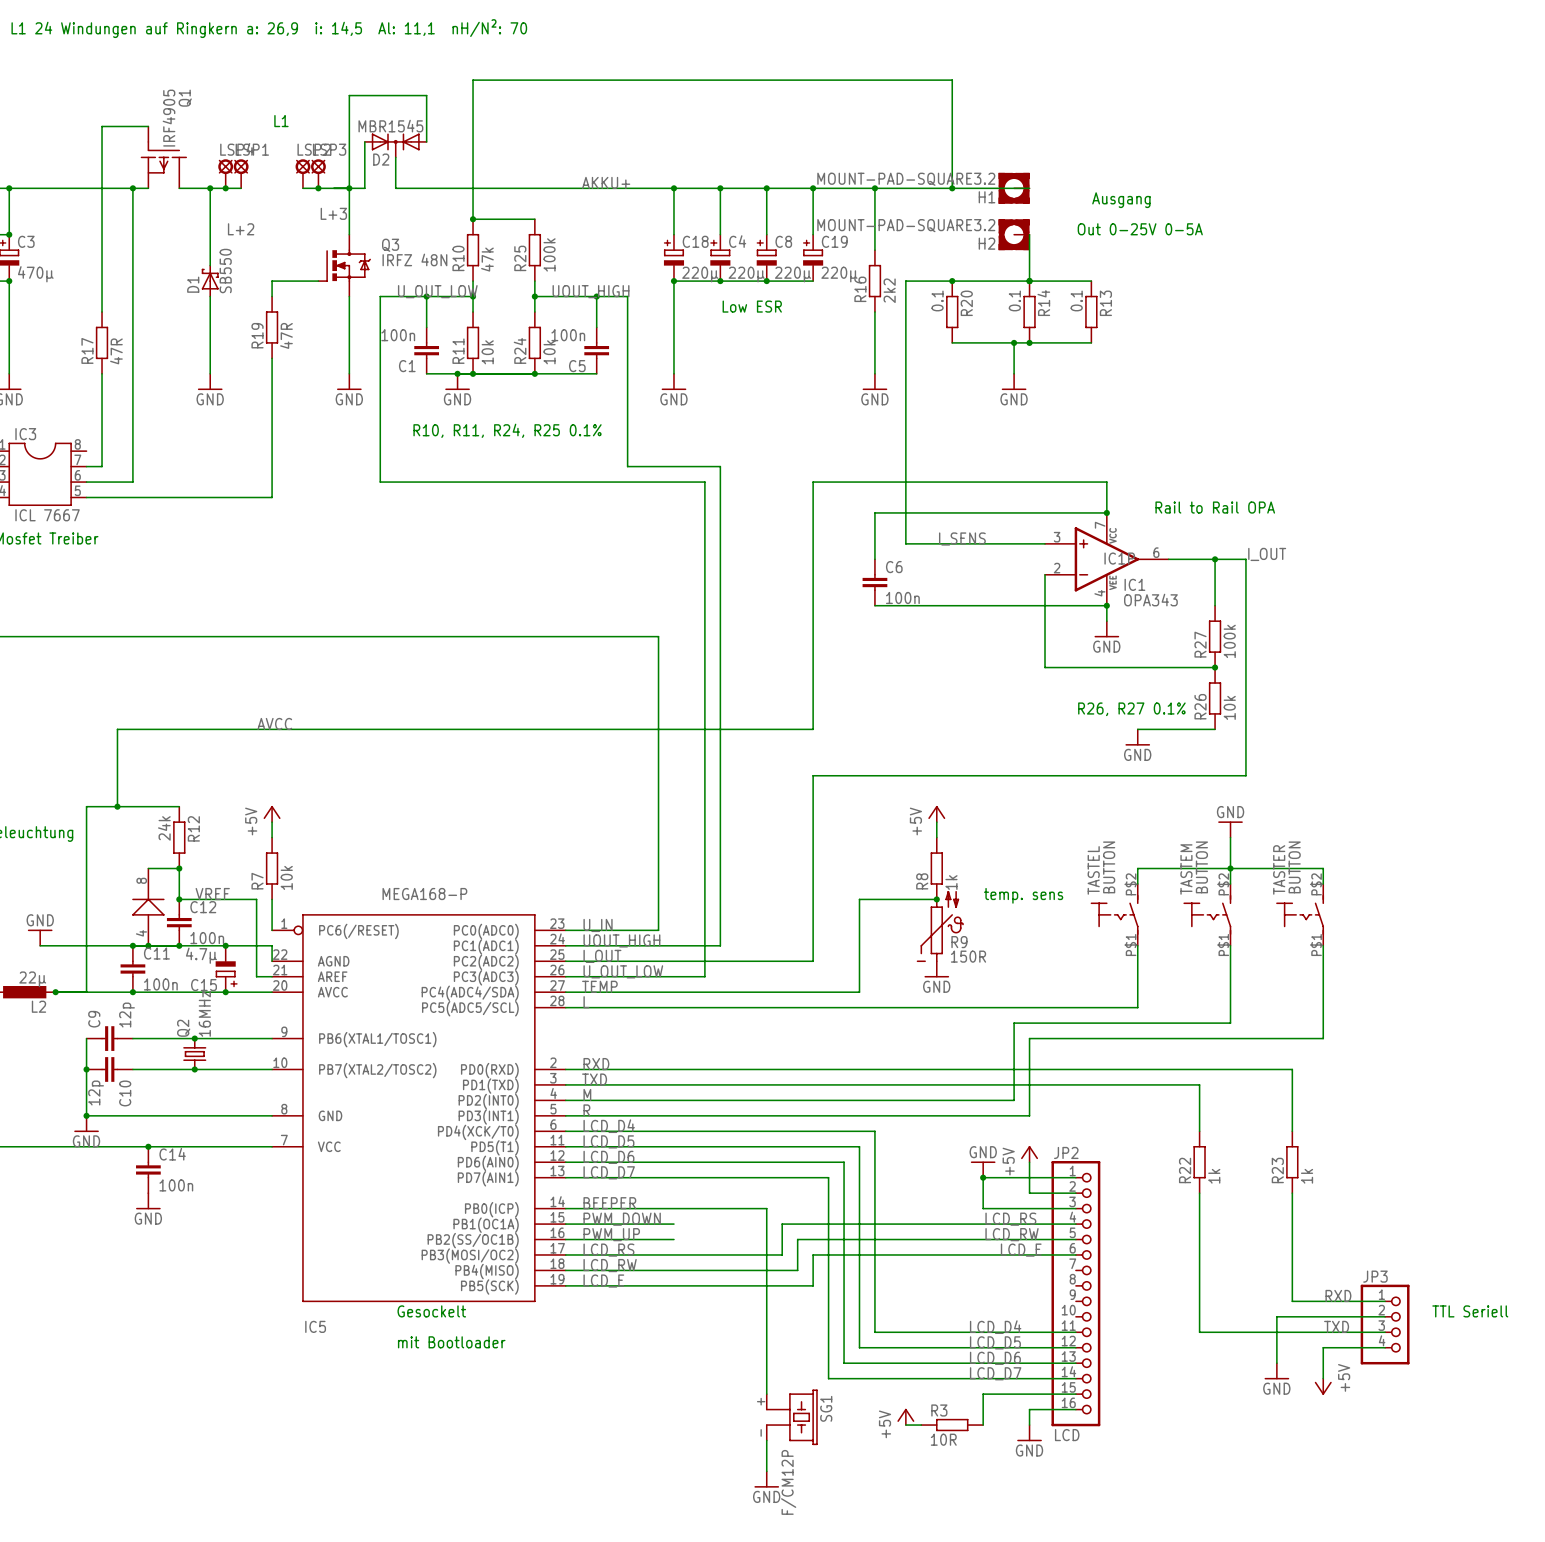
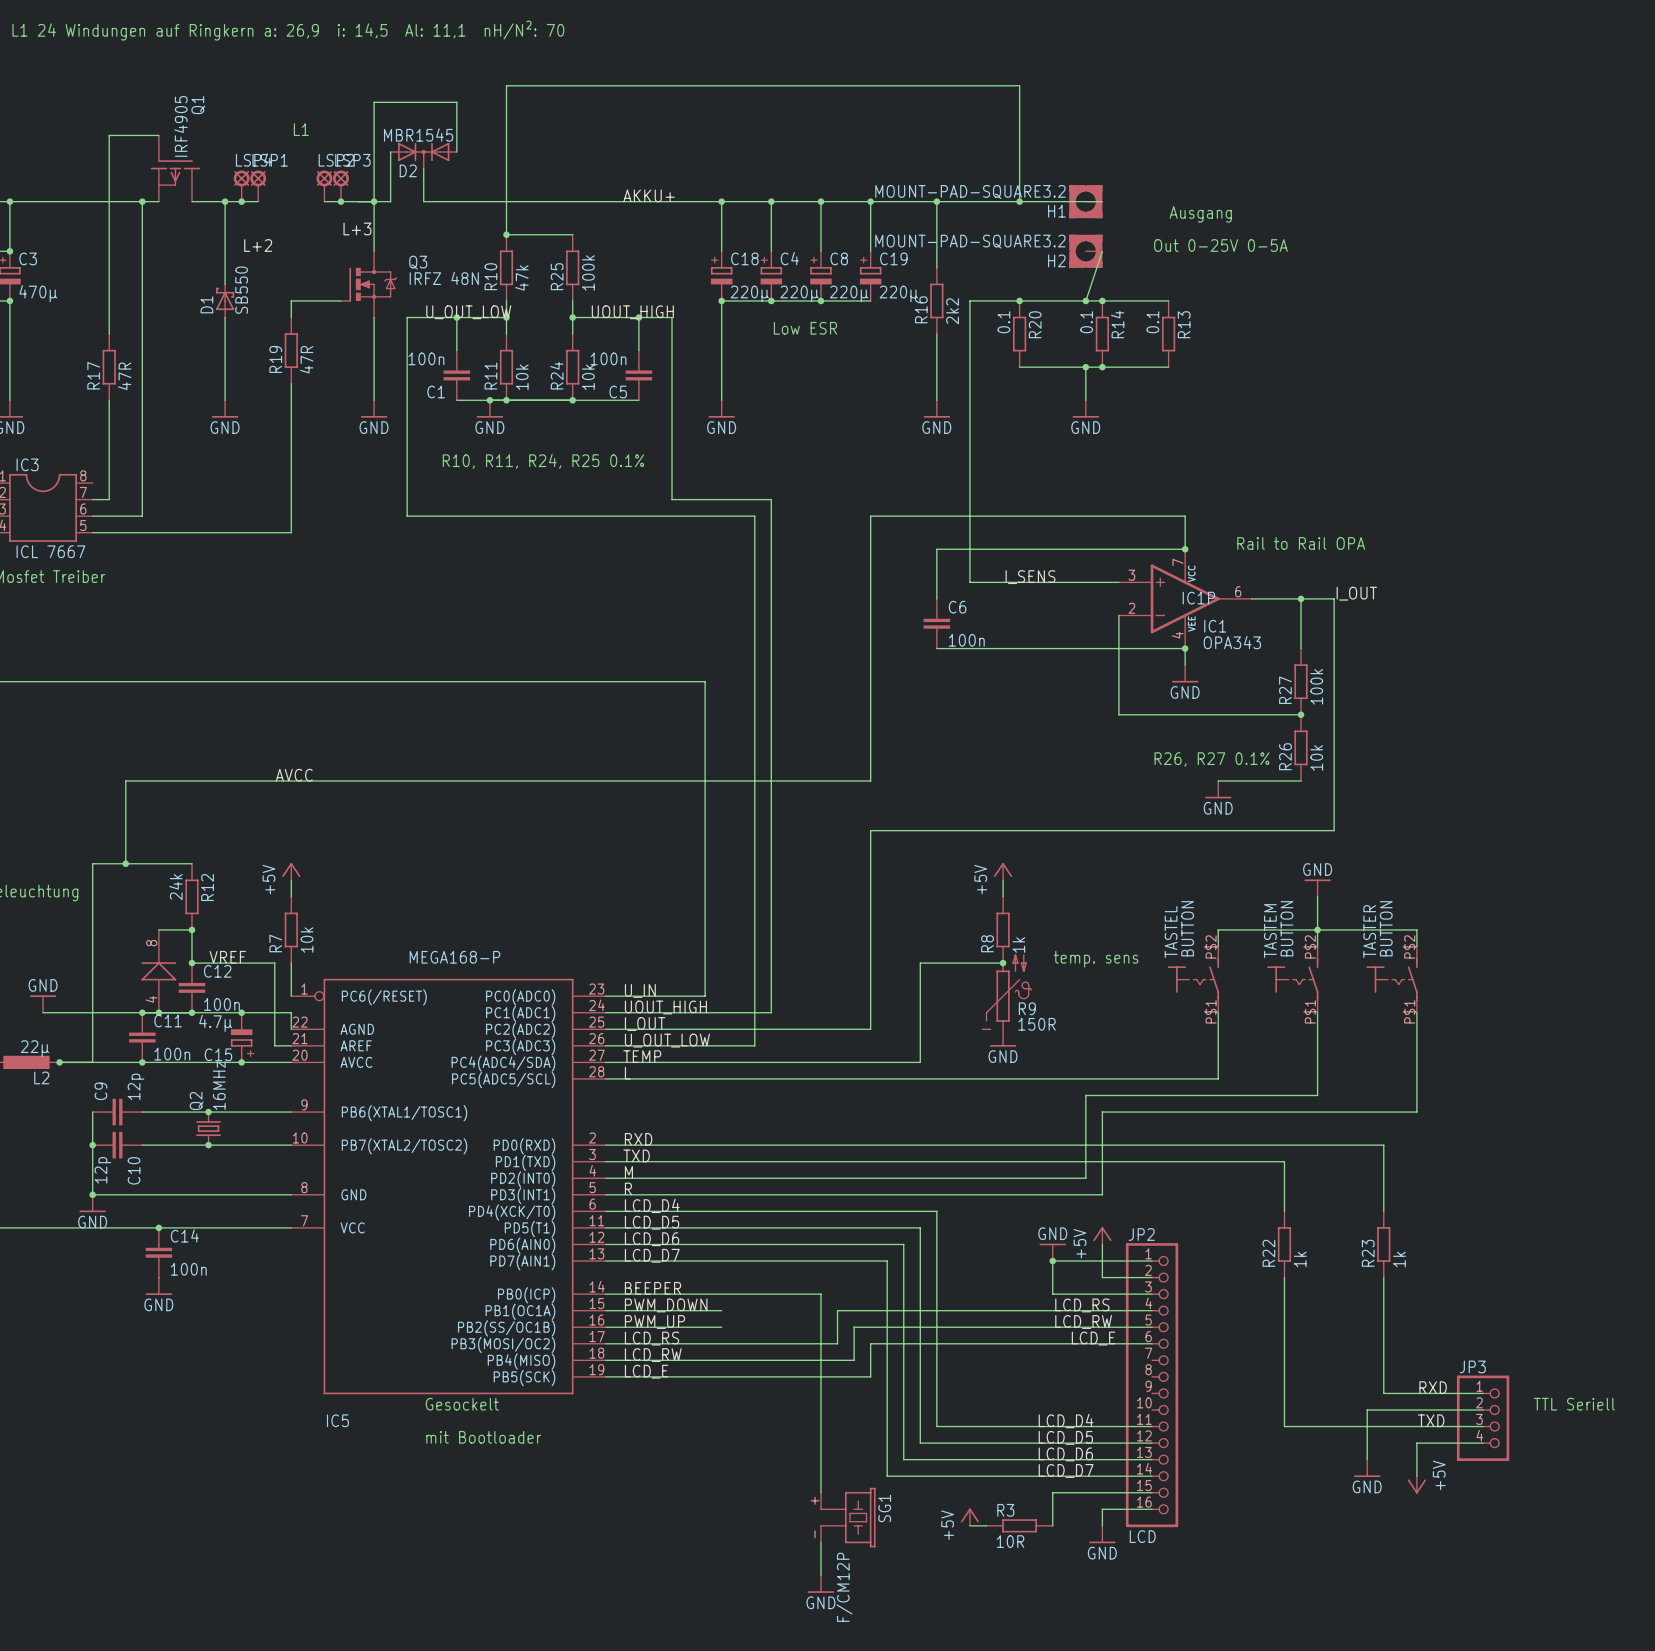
wire: (1029, 234) (1029, 281) -> (1102, 251) (1085, 300)
junction: none -> (1085, 300)

